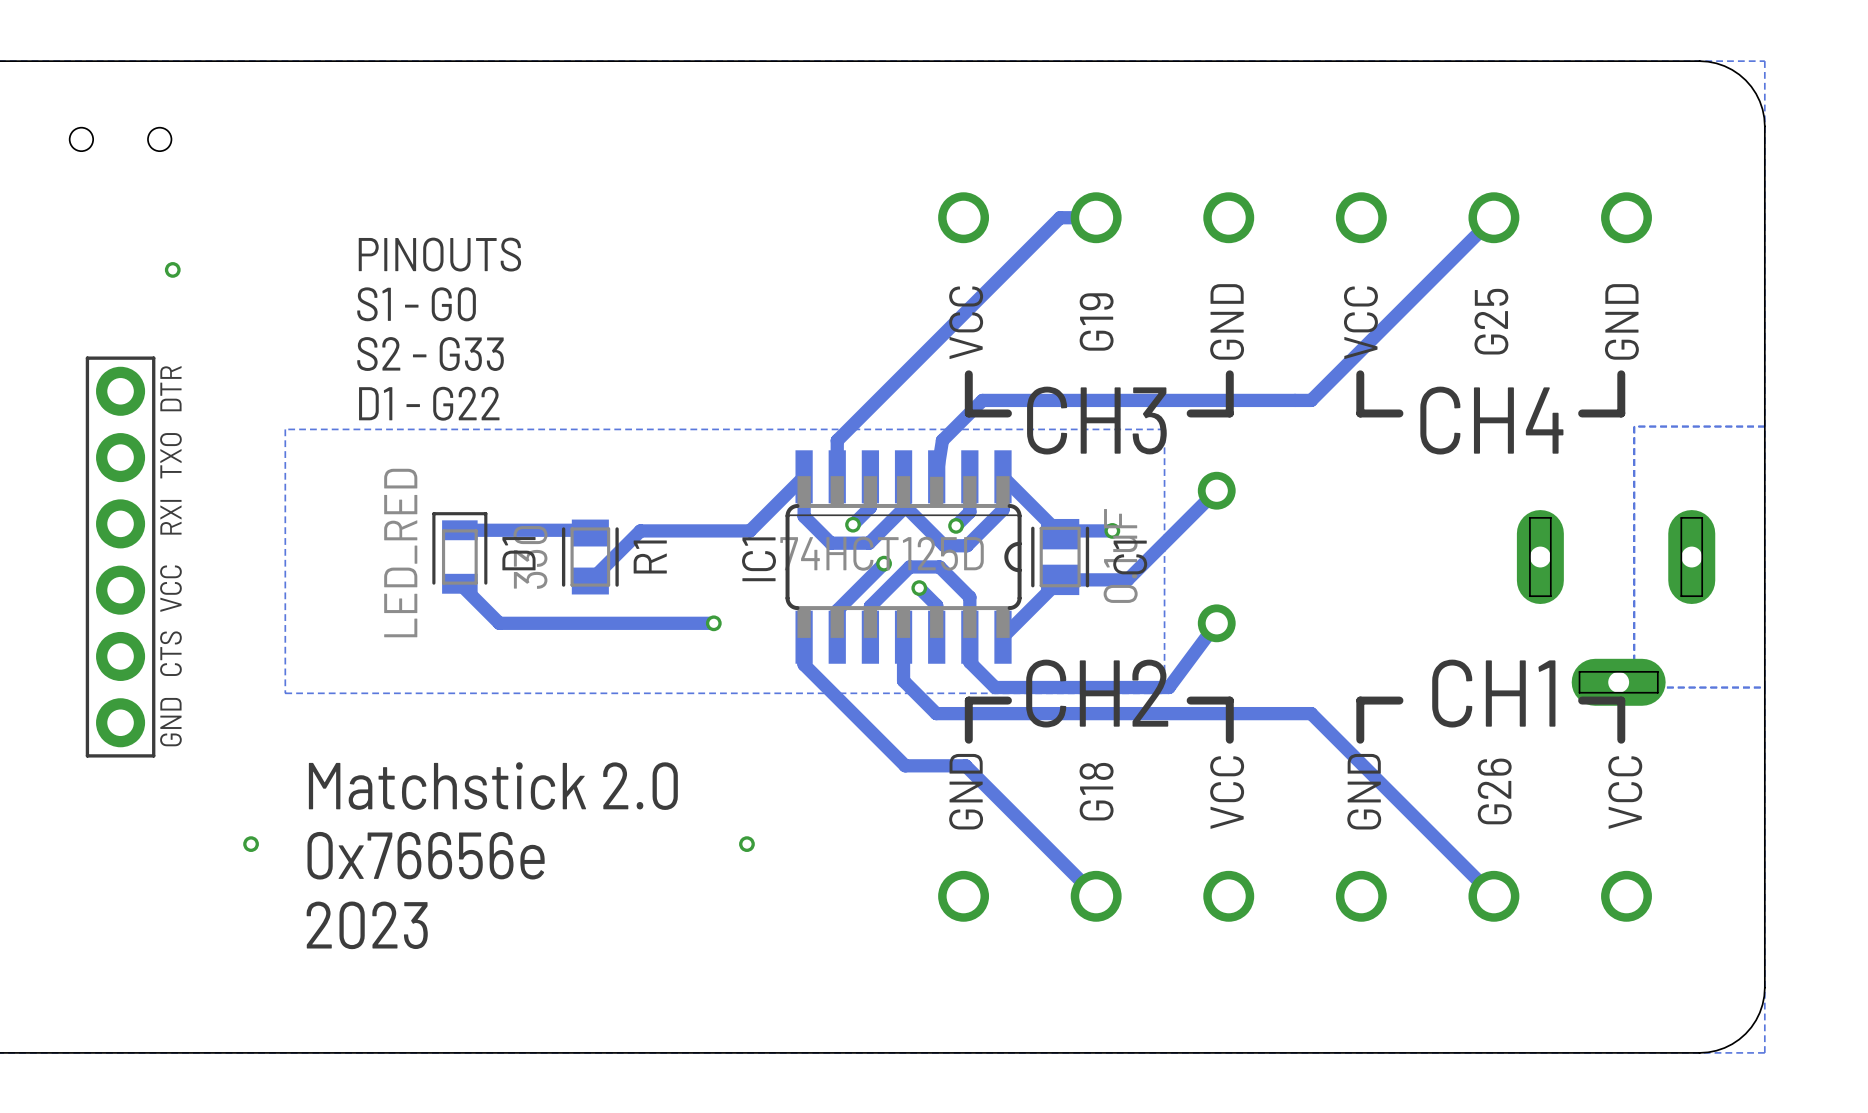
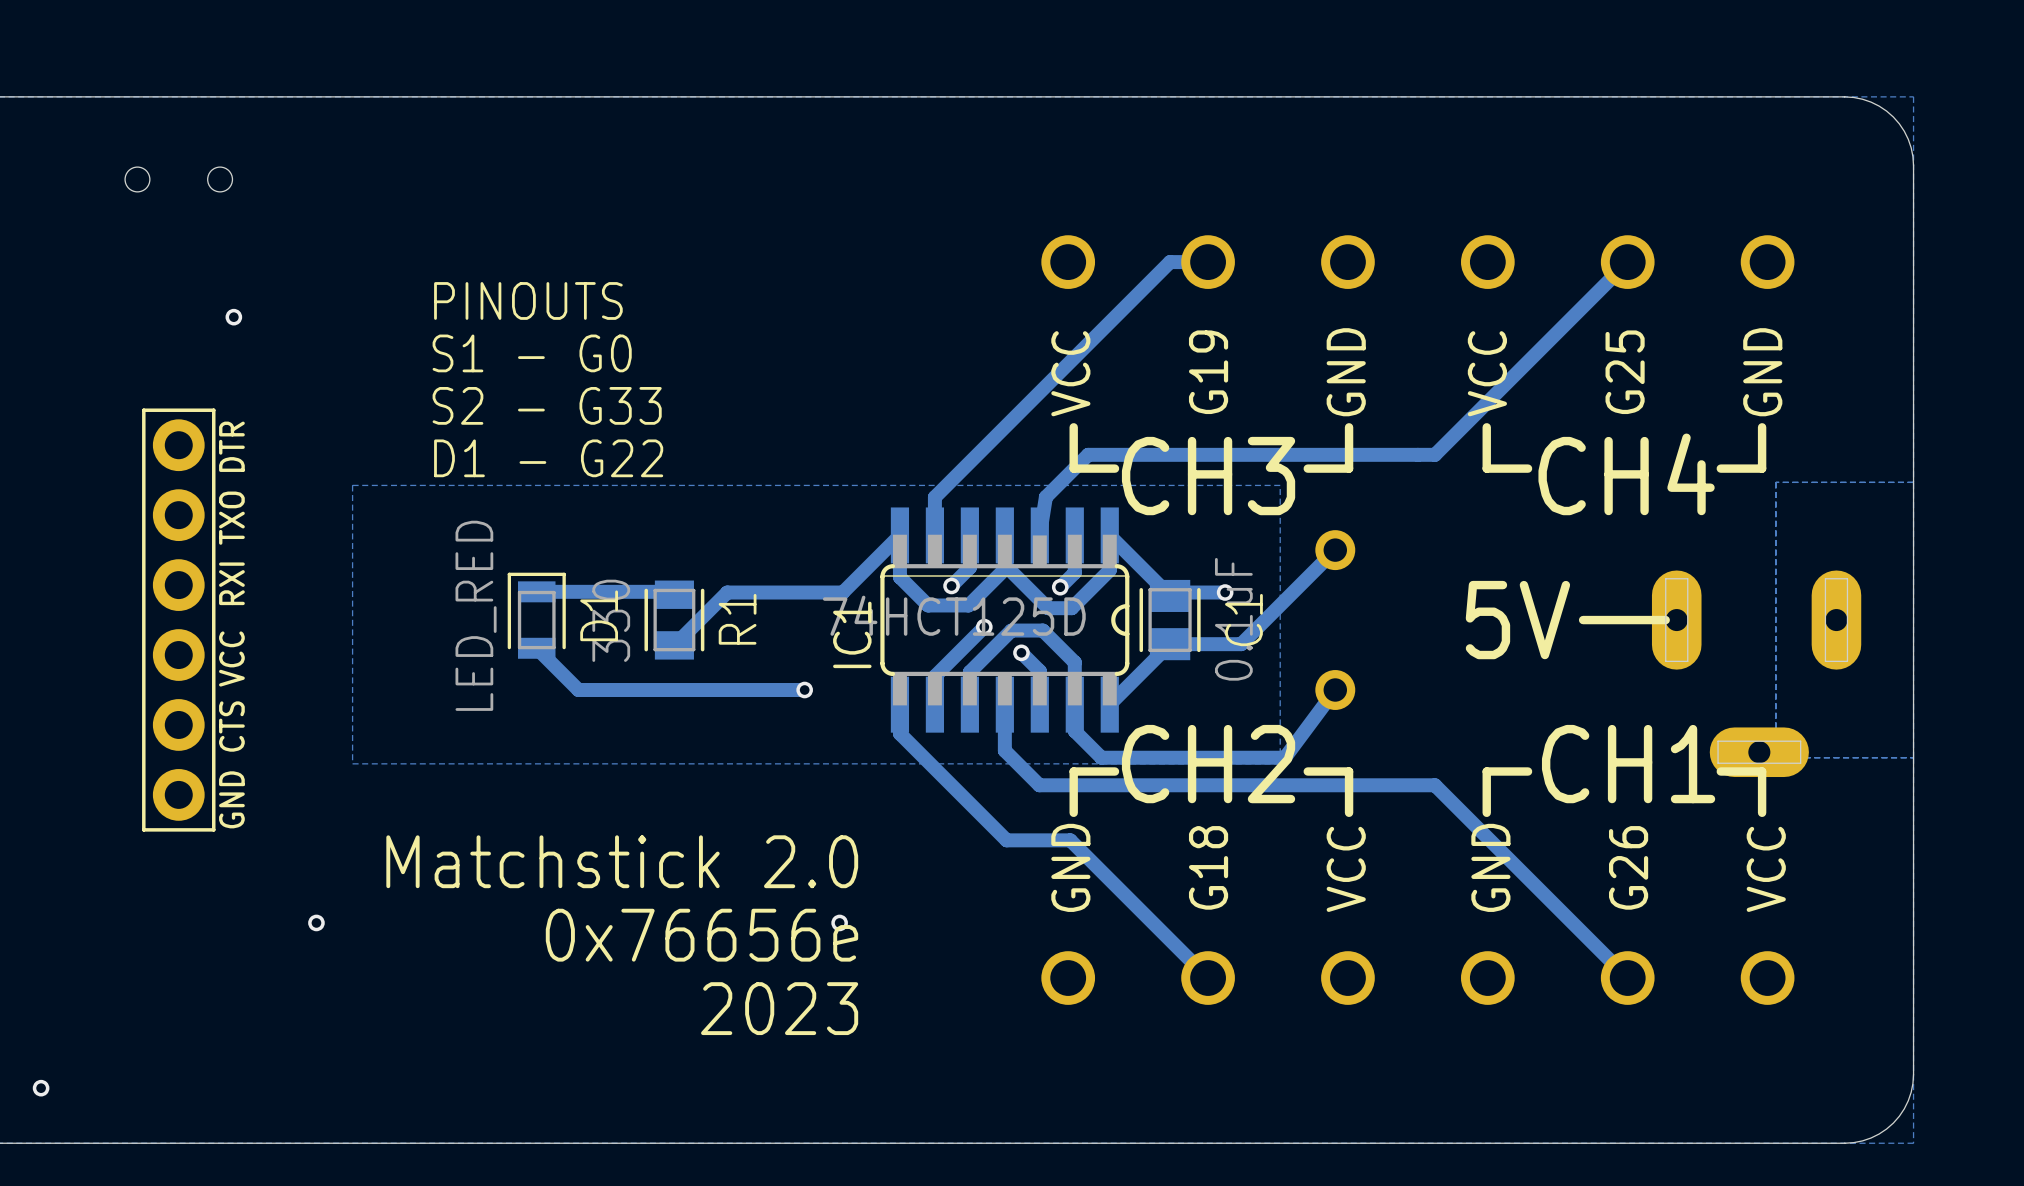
text: none -> 5V (1517, 620)
line: none -> (1665, 620) (1583, 620)
text position: Matchstick 2.0 (493, 786) -> Matchstick 2.0 (622, 861)
text position: 0x76656e (426, 855) -> 0x76656e (701, 935)
text position: 2023 (367, 925) -> 2023 (779, 1008)

